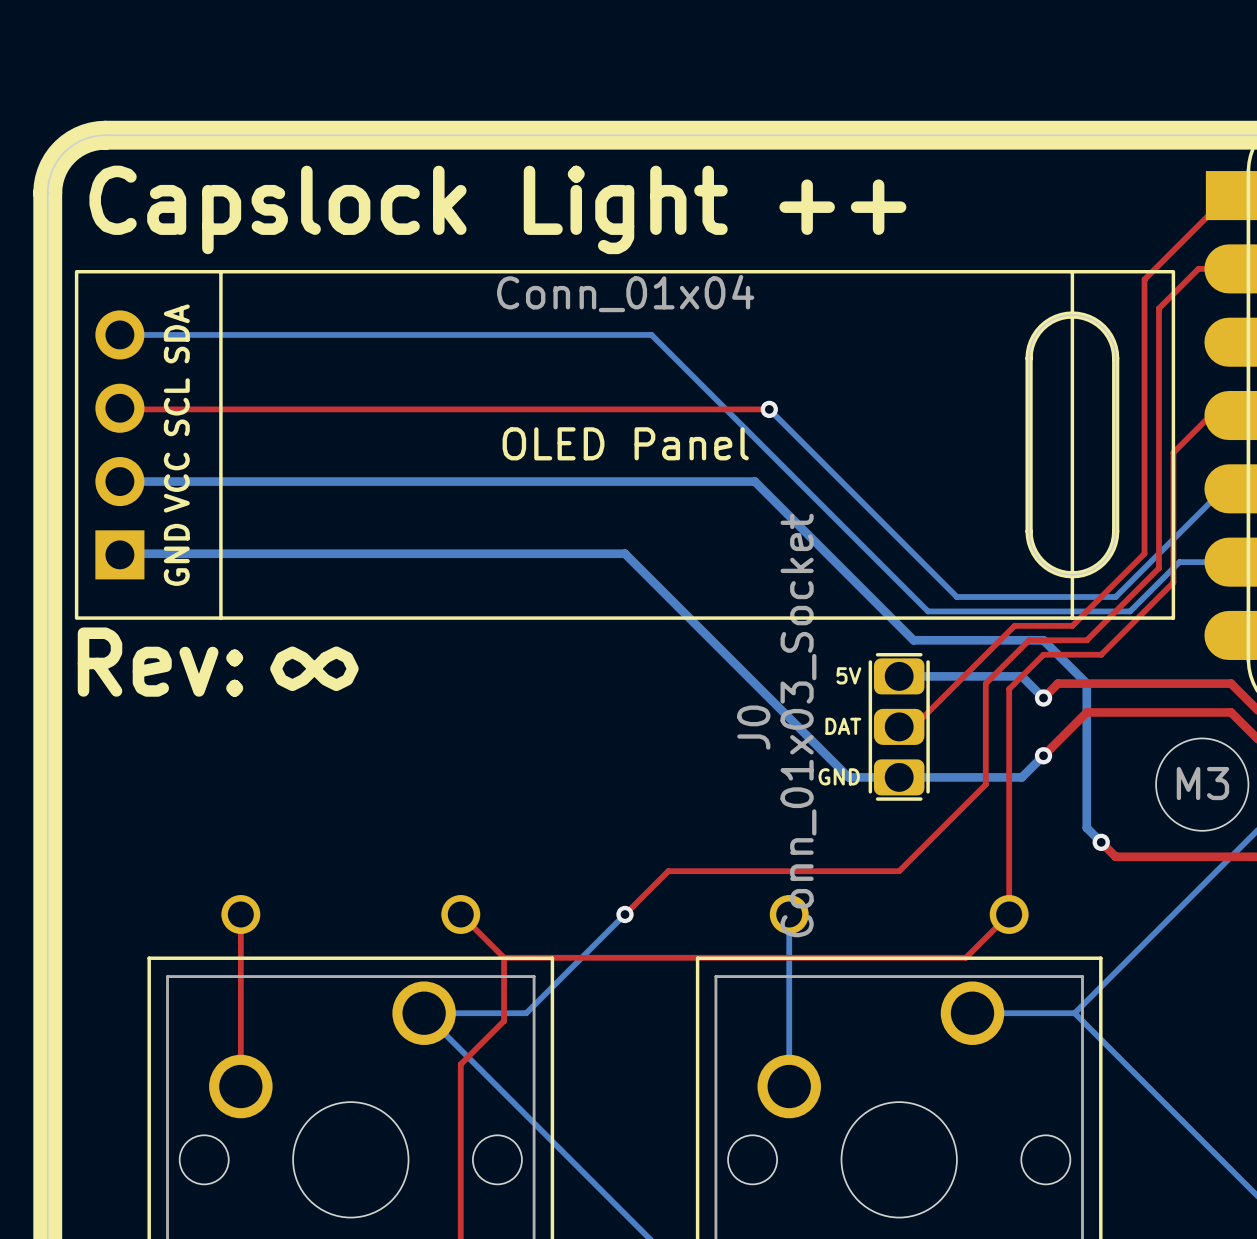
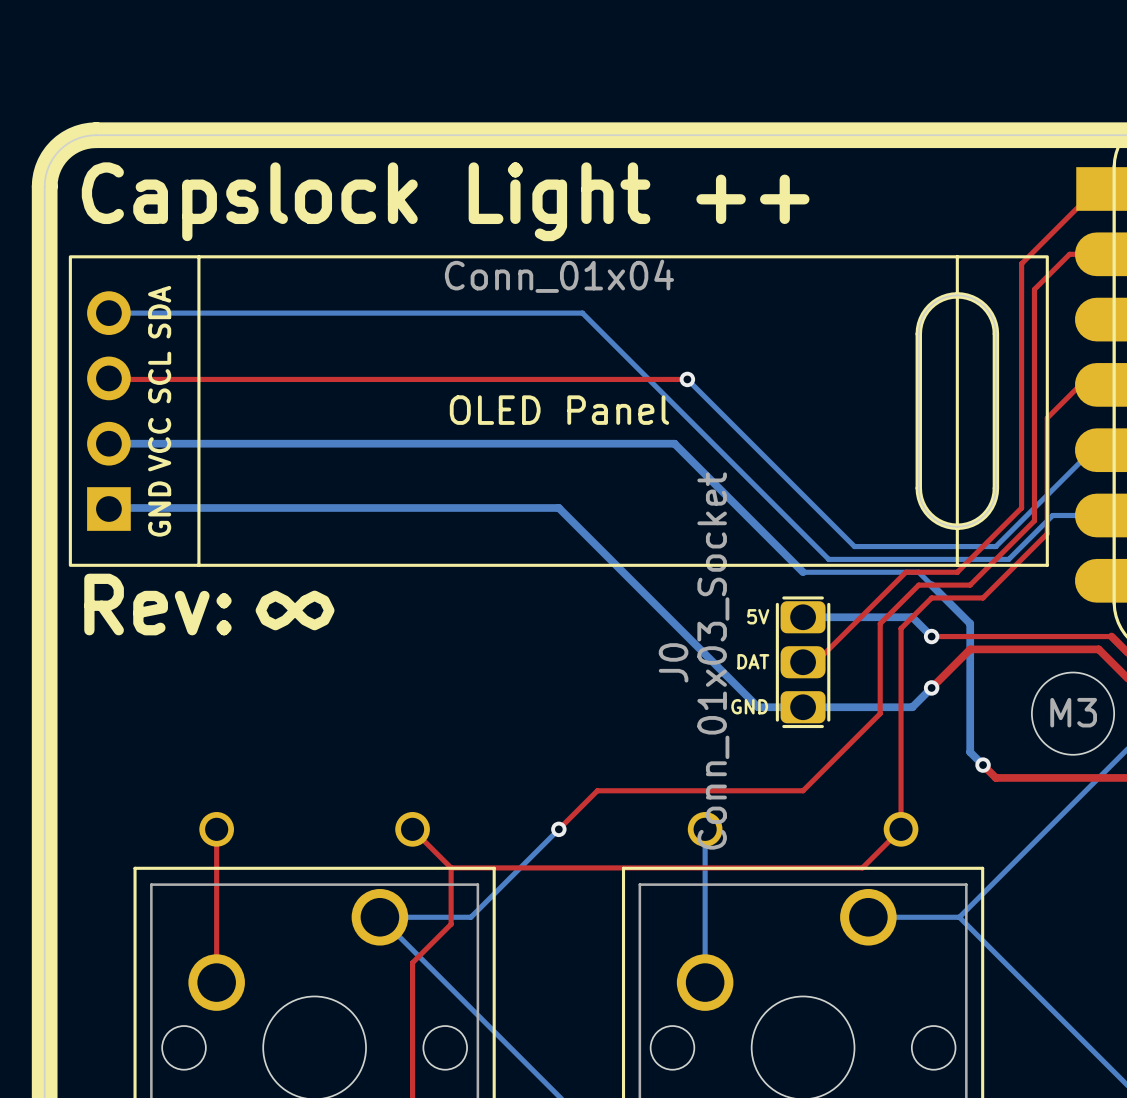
bottom track: (899, 625) (913, 640) (1043, 640) -> (803, 572) (918, 572) (931, 585)
text position: Rev: (160, 662) -> Rev: (157, 604)
text position: ∞ (314, 668) -> ∞ (295, 610)
top track: (1043, 698) (1057, 683) (1231, 683) (1245, 698) -> (931, 636) (1111, 636)

